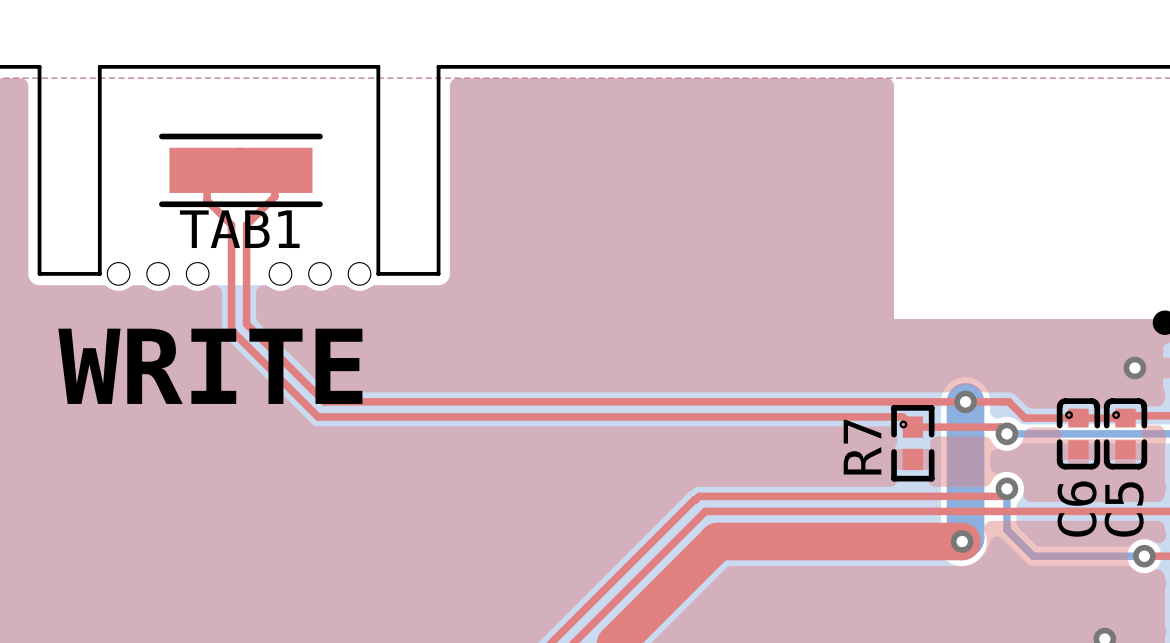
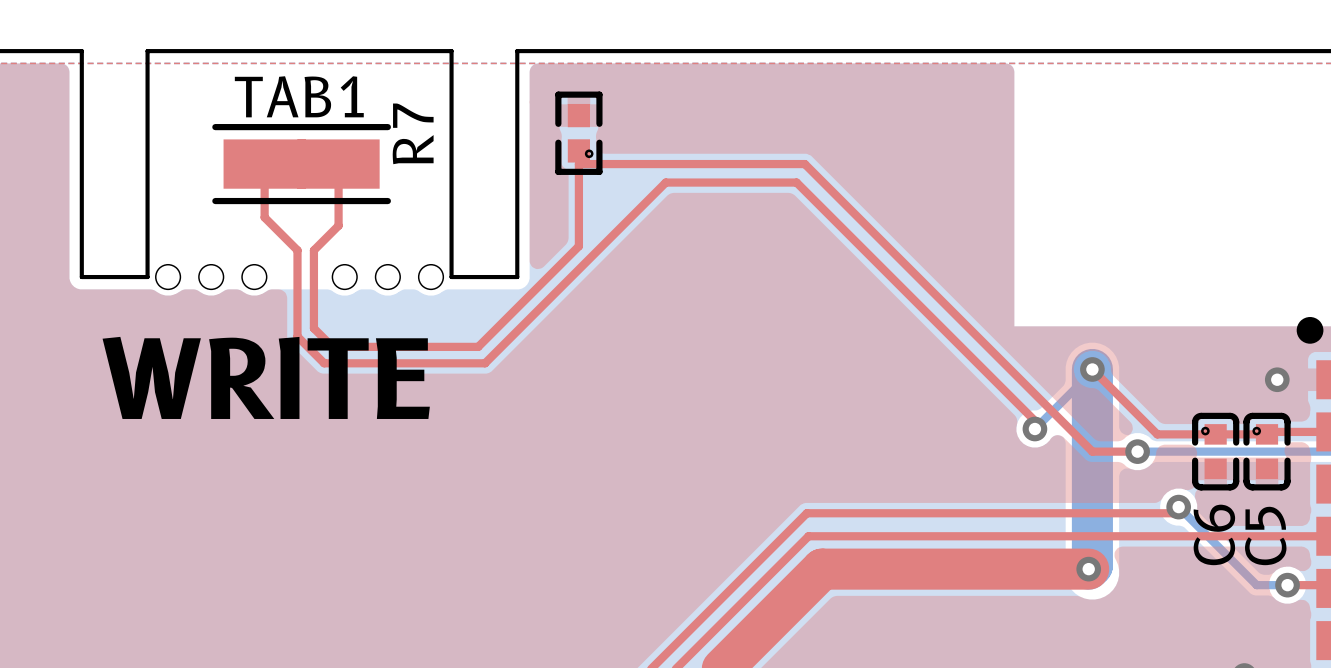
top track: (274, 196) (246, 224) (246, 324) (324, 401) (1008, 401) -> (338, 192) (338, 225) (313, 250) (313, 328) (332, 346) (478, 346) (578, 246) (578, 164) (804, 164) (1092, 451) (1137, 451)
top track: (207, 200) (231, 224) (231, 330) (318, 416) (902, 416) (912, 427) (1000, 427) (1006, 433) -> (264, 196) (264, 217) (297, 250) (297, 336) (324, 363) (485, 363) (665, 182) (796, 182) (1034, 420) (1034, 429)
TAB1 name position: TAB1 (239, 229) -> TAB1 (299, 96)
top track: none -> (1092, 369) (1139, 416)
via: none -> (1092, 369)
bottom track: none -> (1092, 416) (1092, 369) (1034, 429)
via: (965, 401) -> none
via: none -> (1034, 429)
R7 rotation: 0° (912, 443) -> 180° (578, 133)
R7 position: (912, 443) -> (578, 133)
R7 name position: R7 (862, 447) -> R7 (413, 133)
top track: (1006, 488) (1006, 492) (1002, 496) (699, 496) (694, 499) -> (1178, 507) (1172, 513) (806, 513) (796, 523)
bottom track: (1006, 488) (1006, 529) (1033, 556) (1116, 556) -> (1178, 507) (1256, 585)
via position: (1006, 488) -> (1178, 507)

